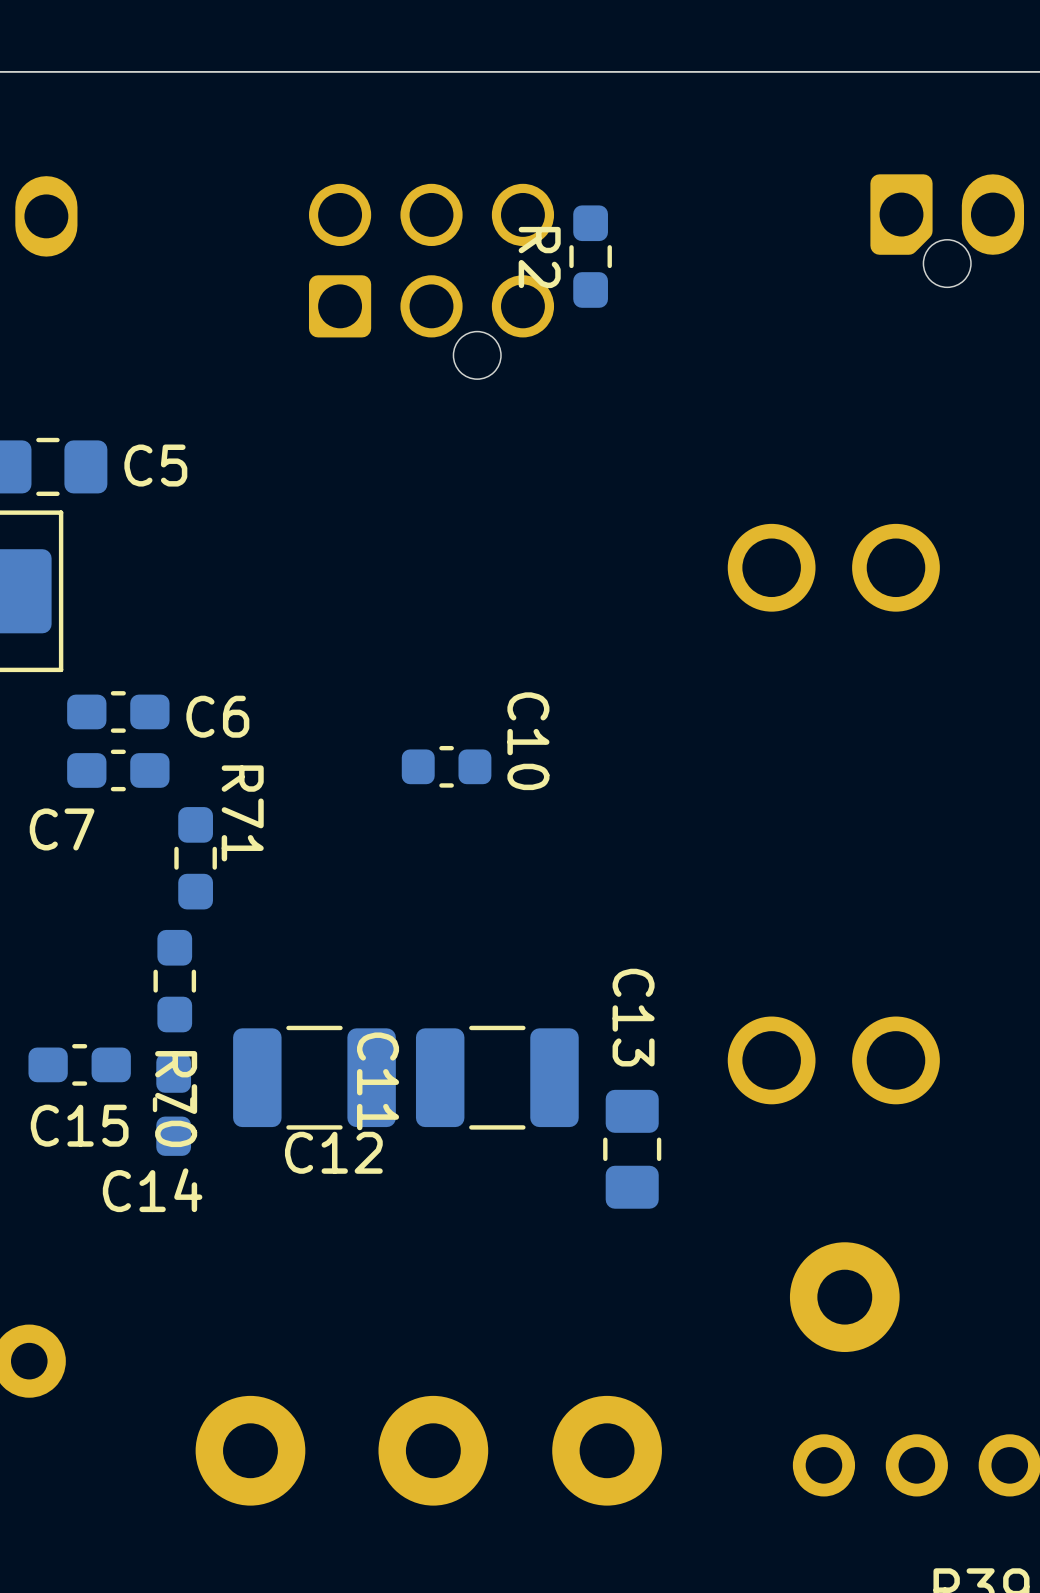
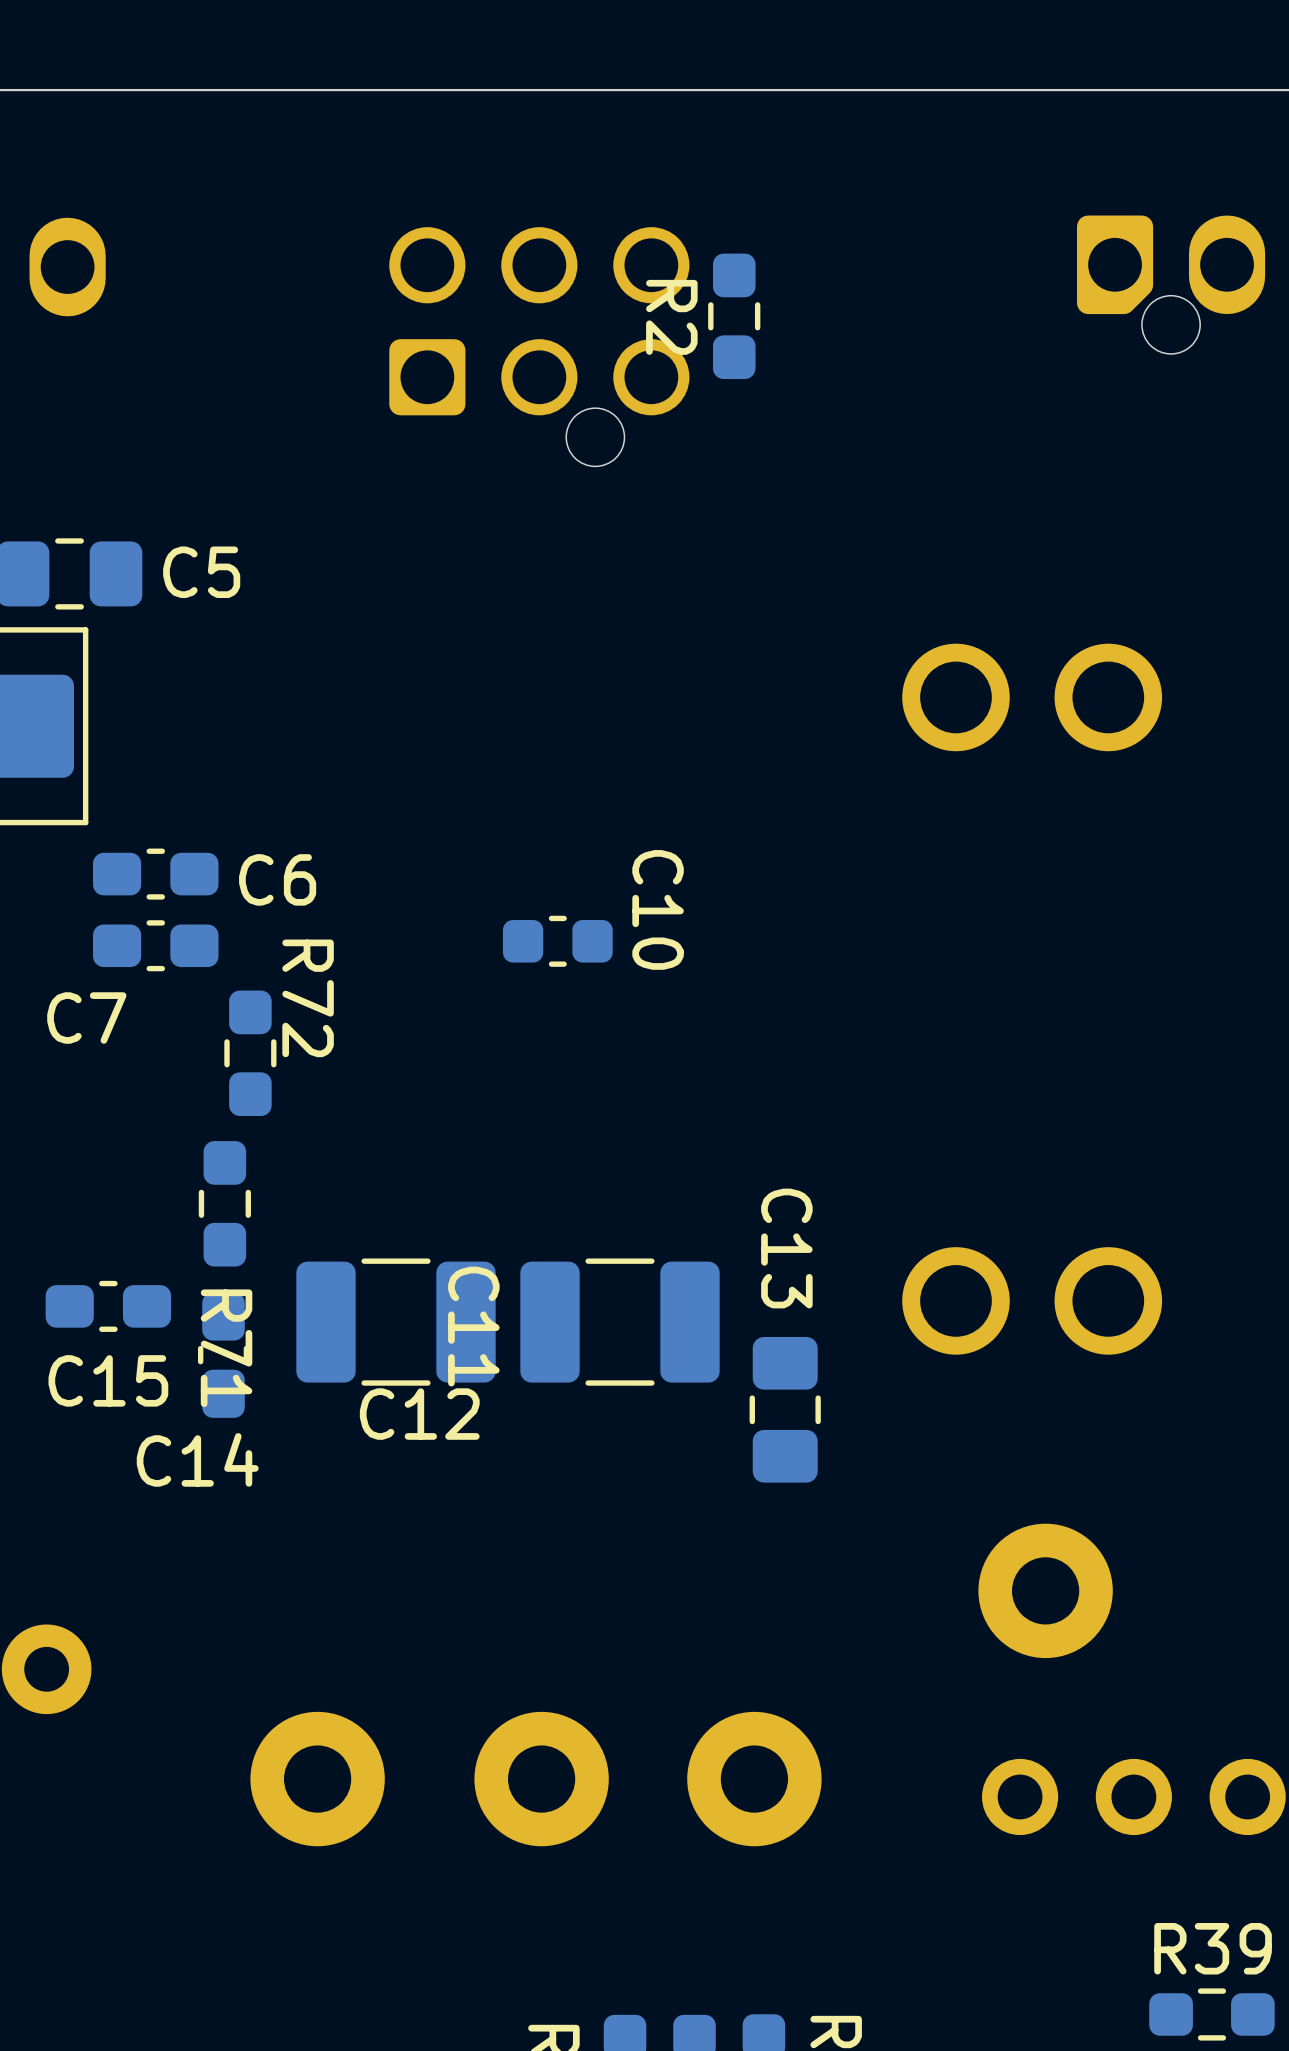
R71 name: R71 (242, 813) -> R72 (308, 998)
R70 name: R70 (176, 1099) -> R71 (226, 1348)

